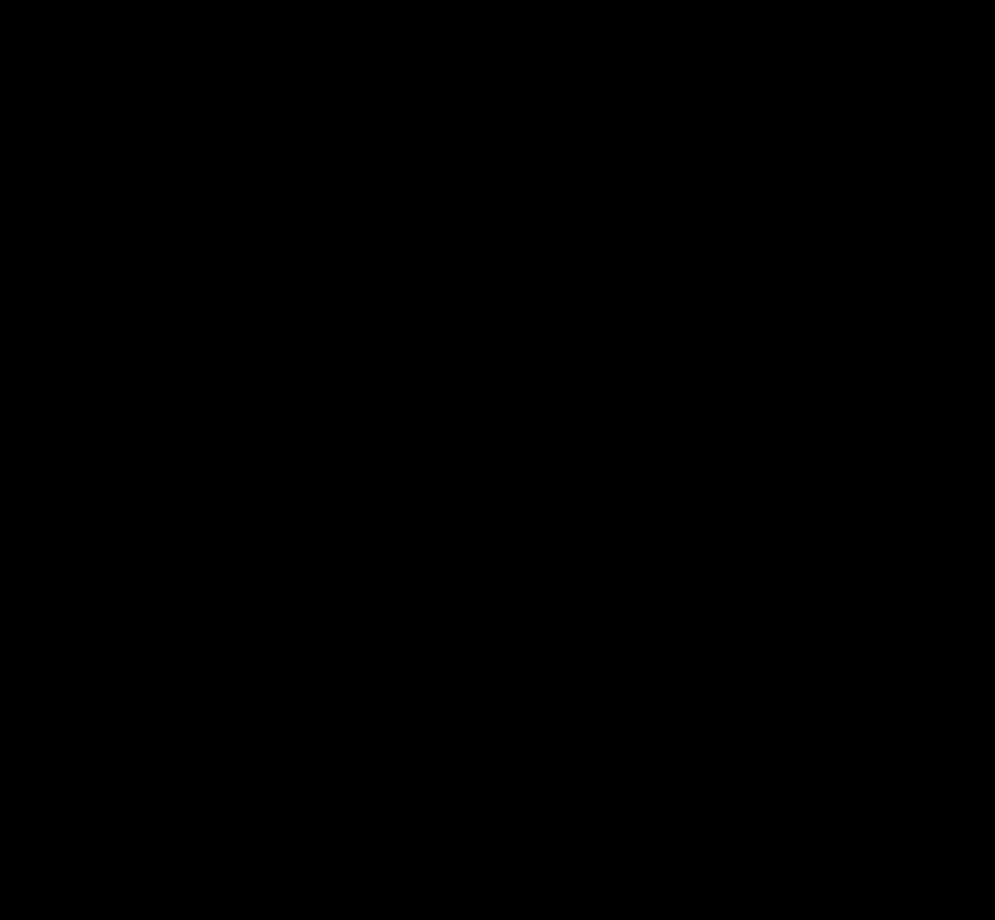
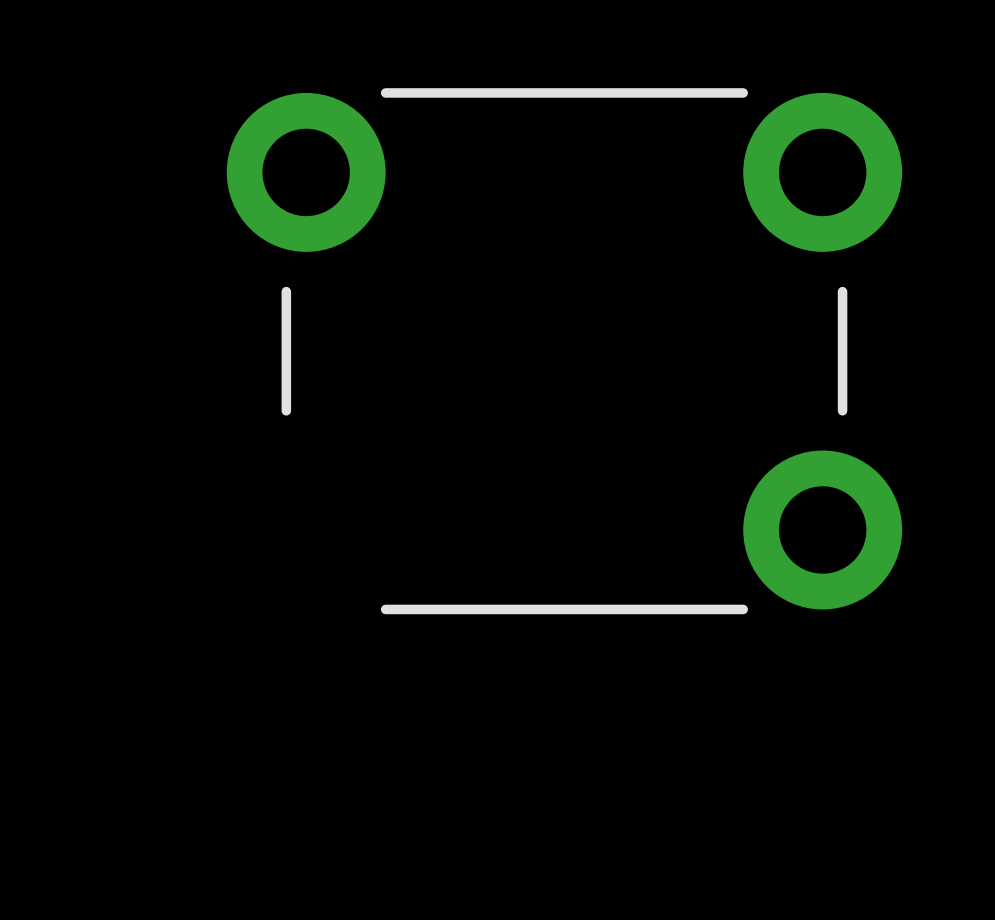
part: none -> (564, 351)

